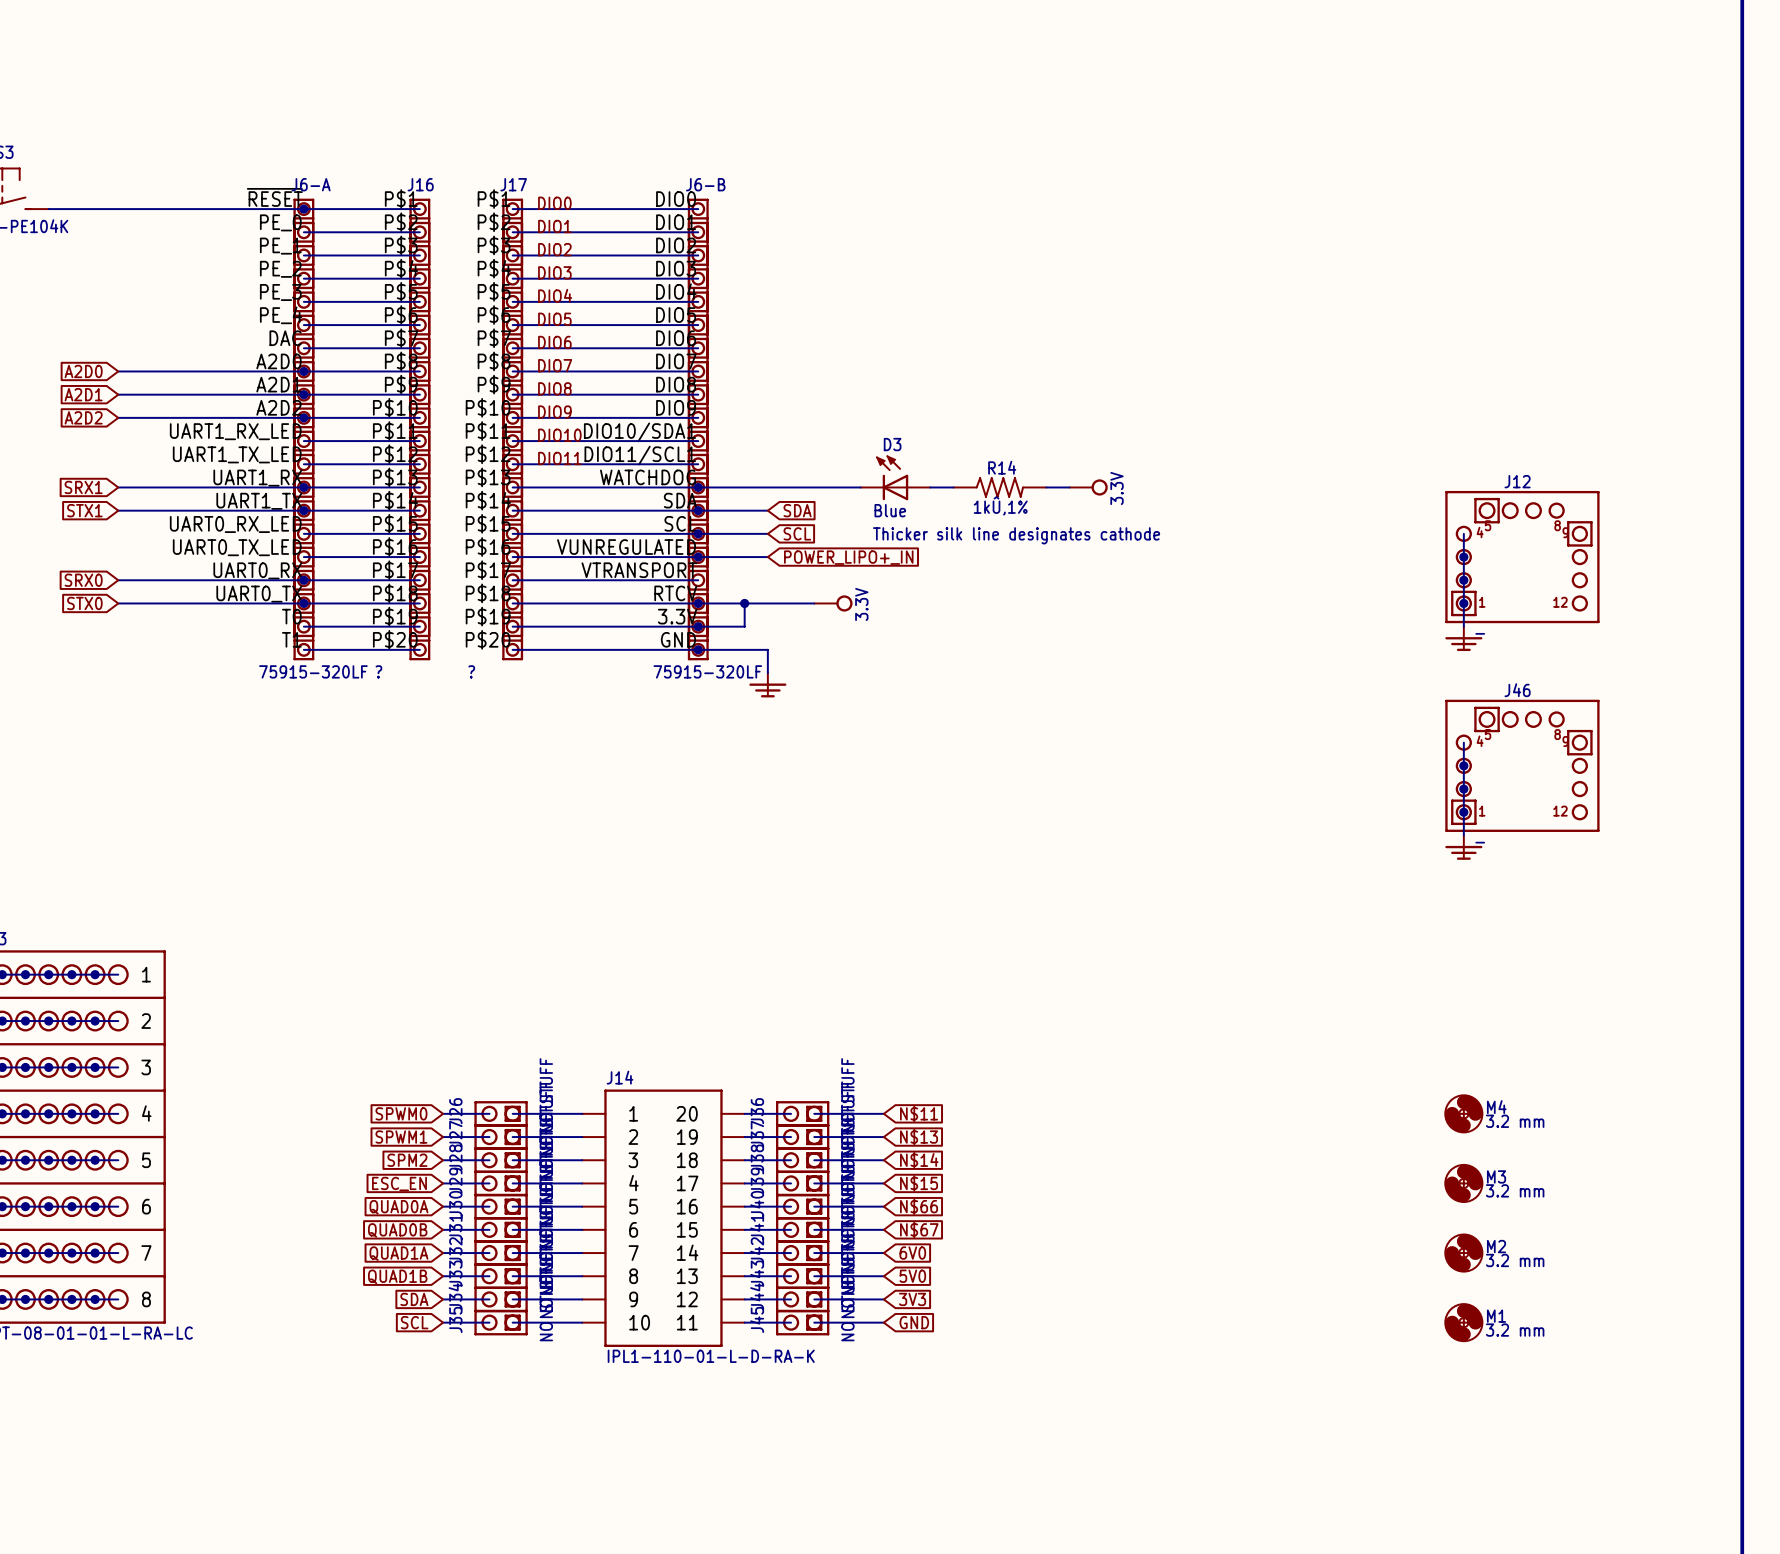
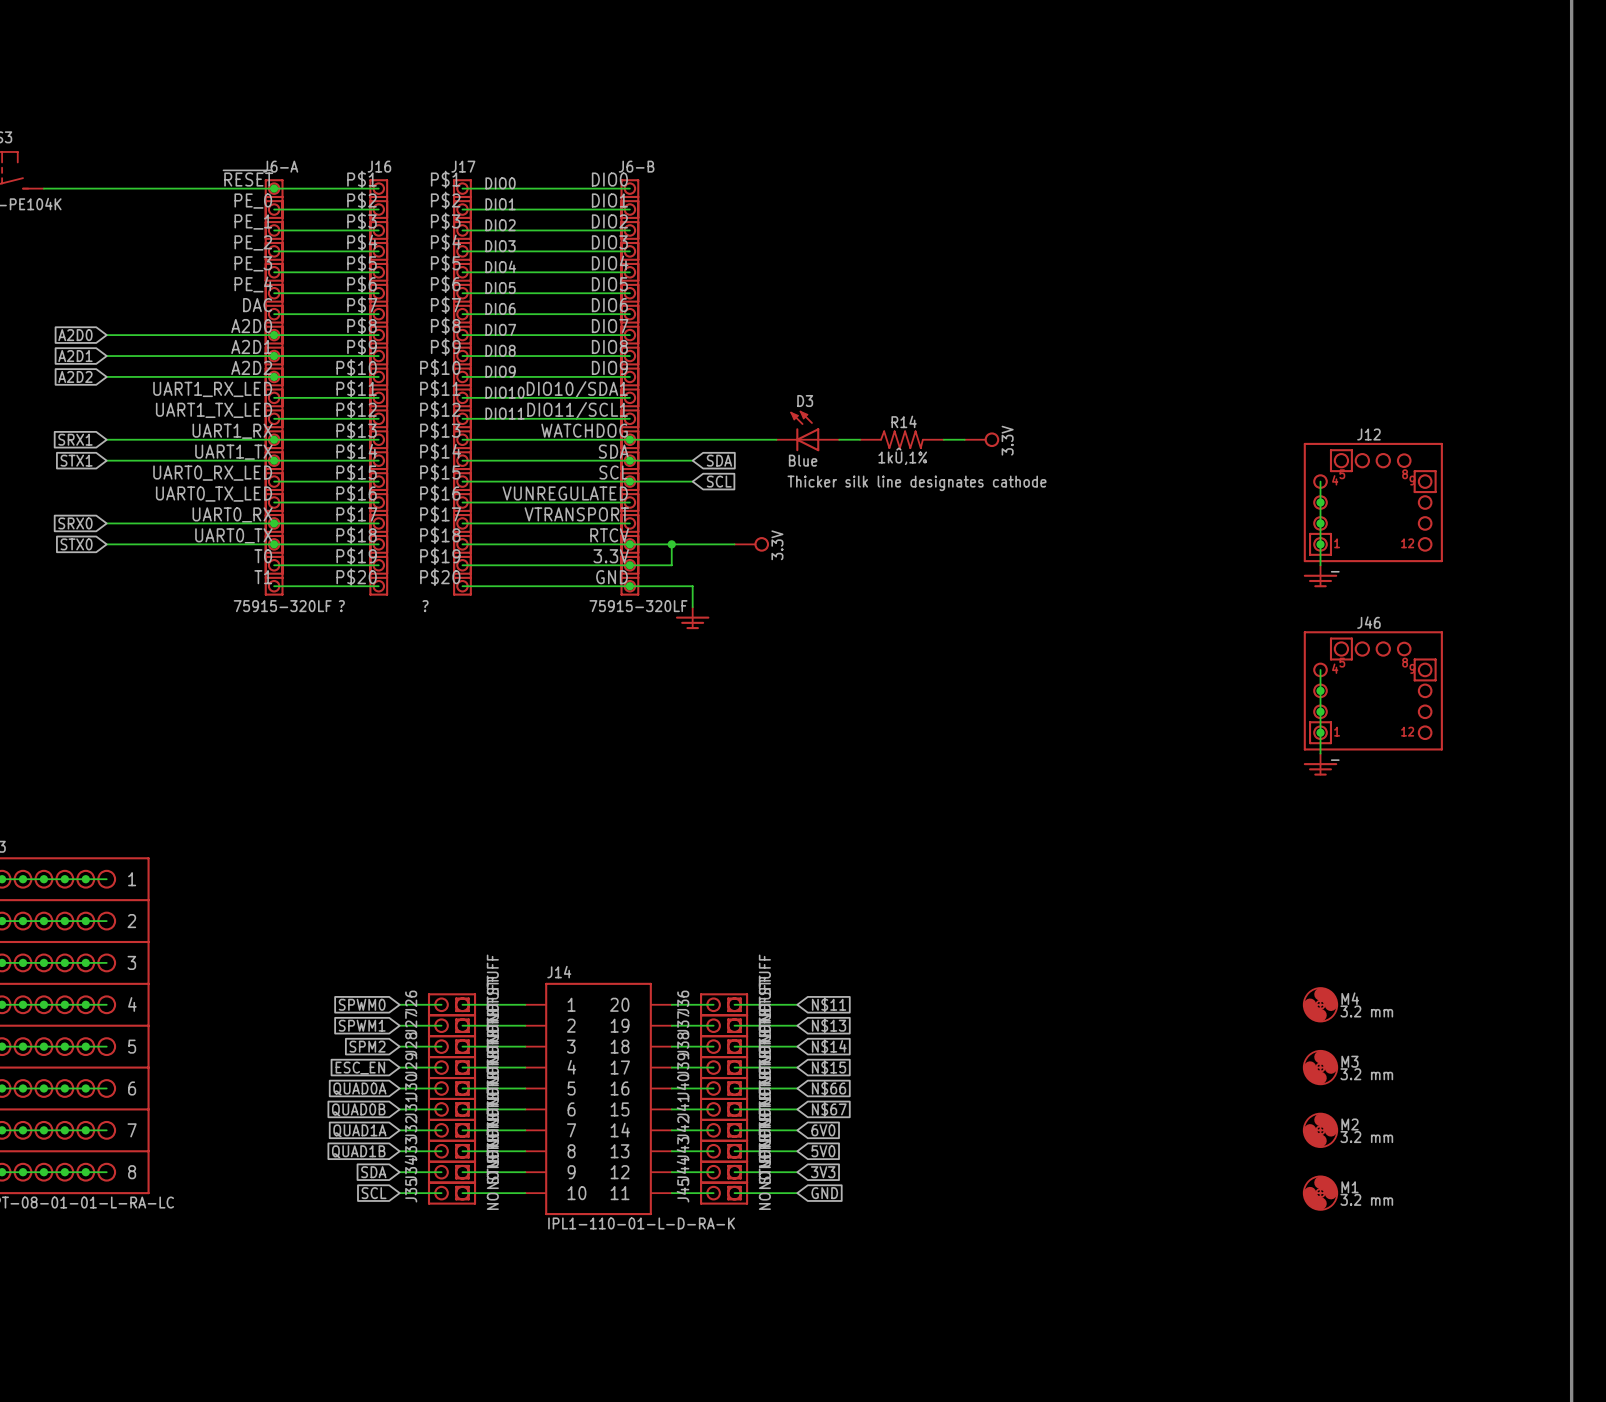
wire: (698, 557) (767, 557) -> none
junction: (698, 557) -> none
global label: POWER_LIPO+_IN (848, 557) -> none

